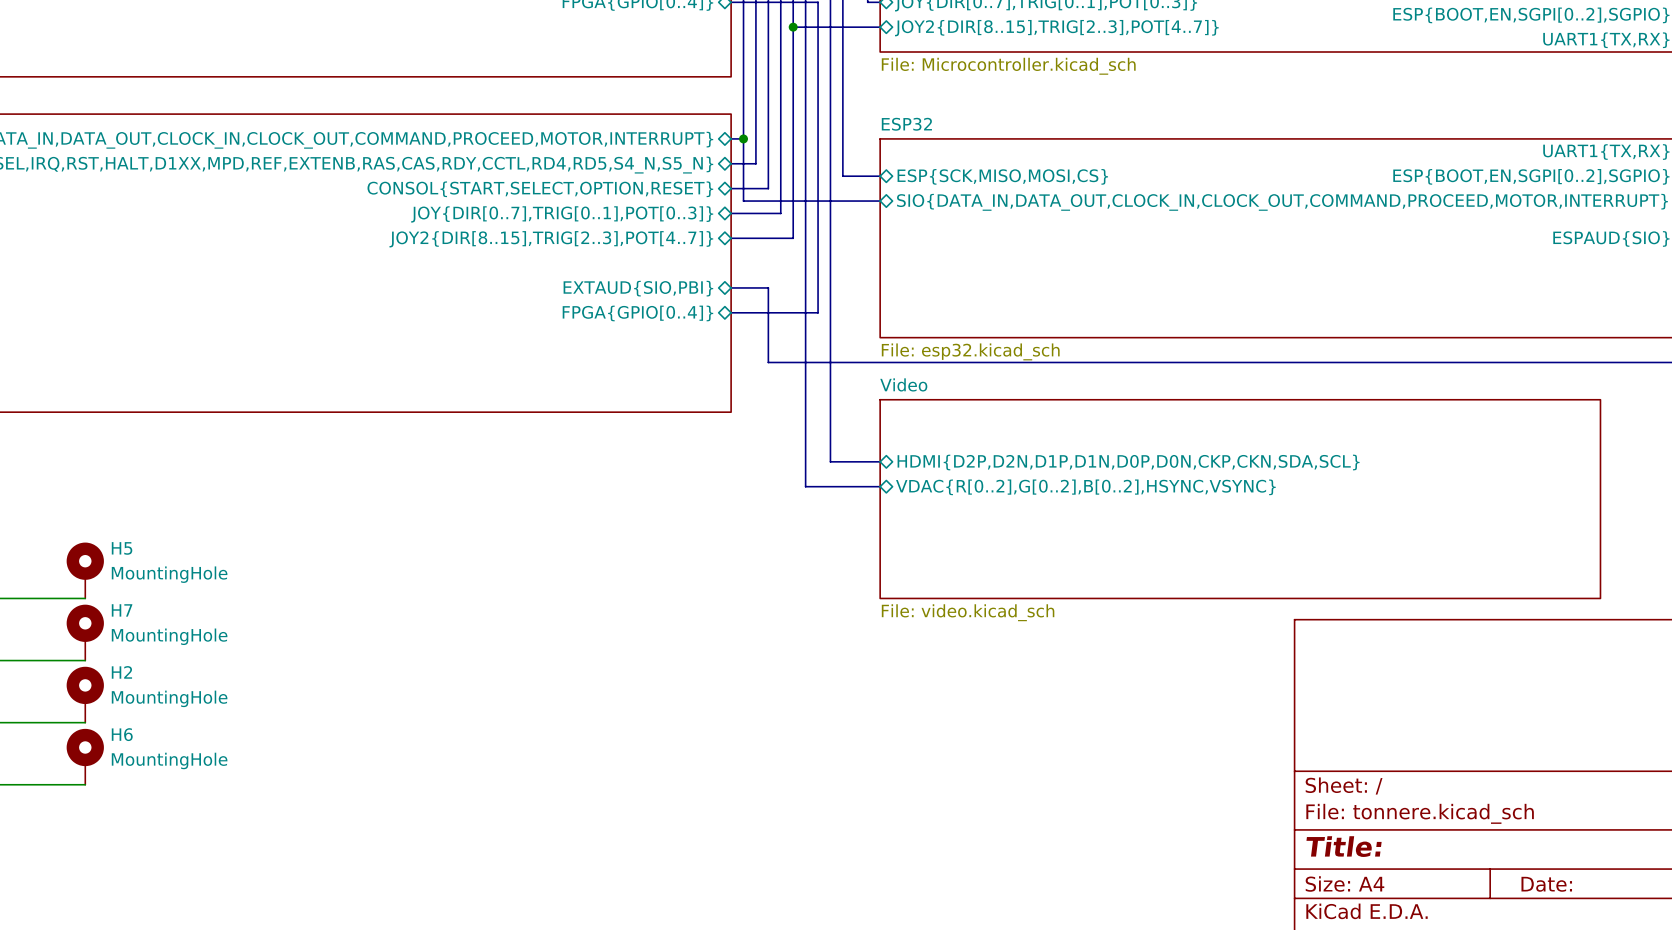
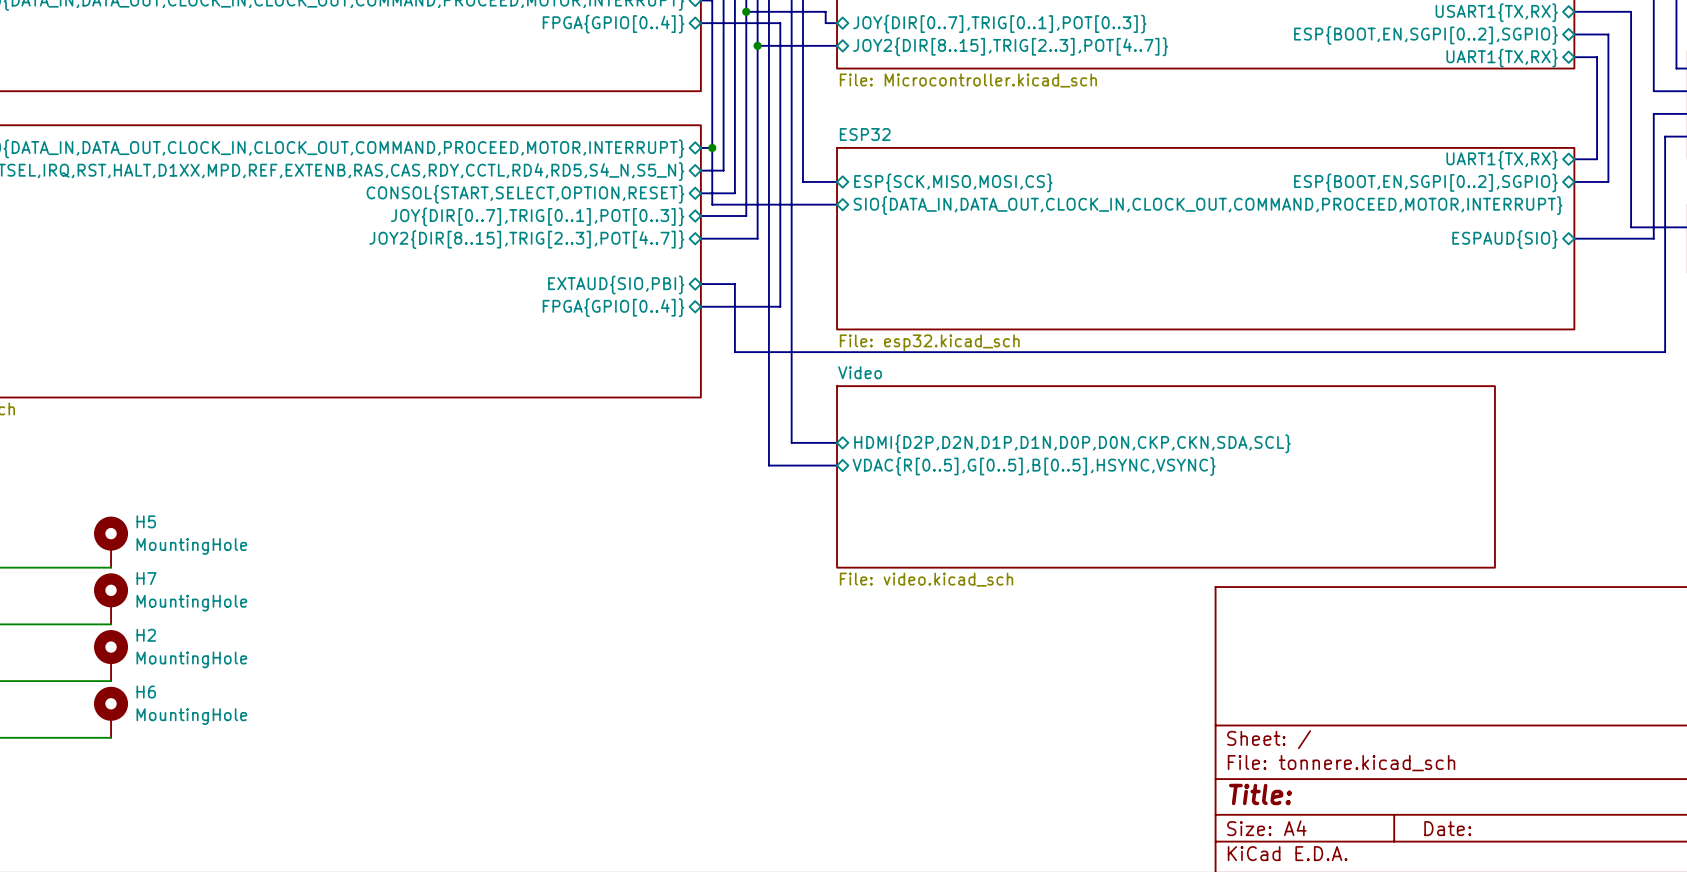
sheet pin: VDAC{R[0..2],G[0..2],B[0..2],HSYNC,VSYNC} (1085, 487) -> VDAC{R[0..5],G[0..5],B[0..5],HSYNC,VSYNC} (1034, 466)

